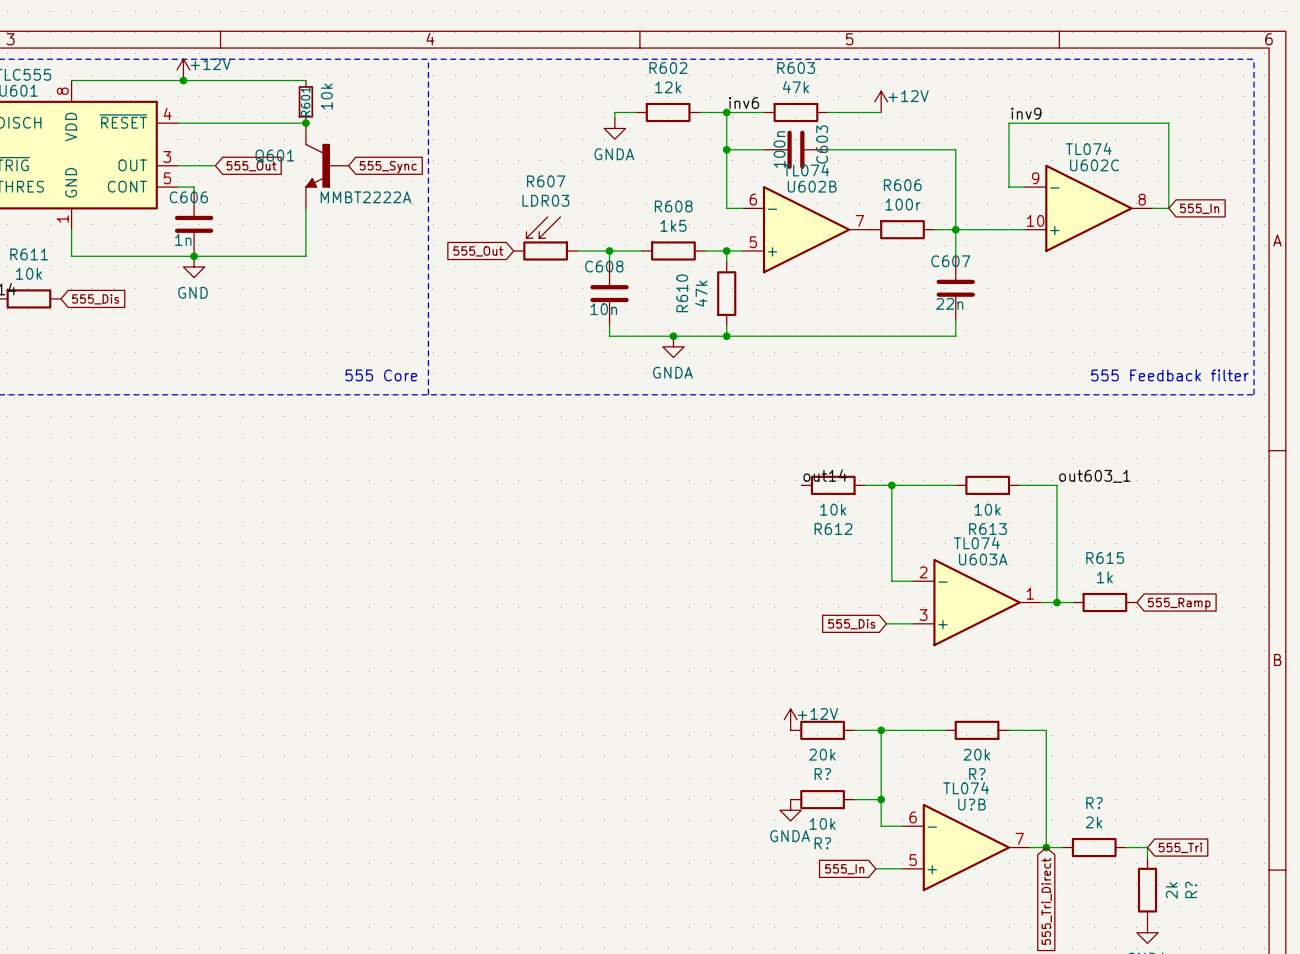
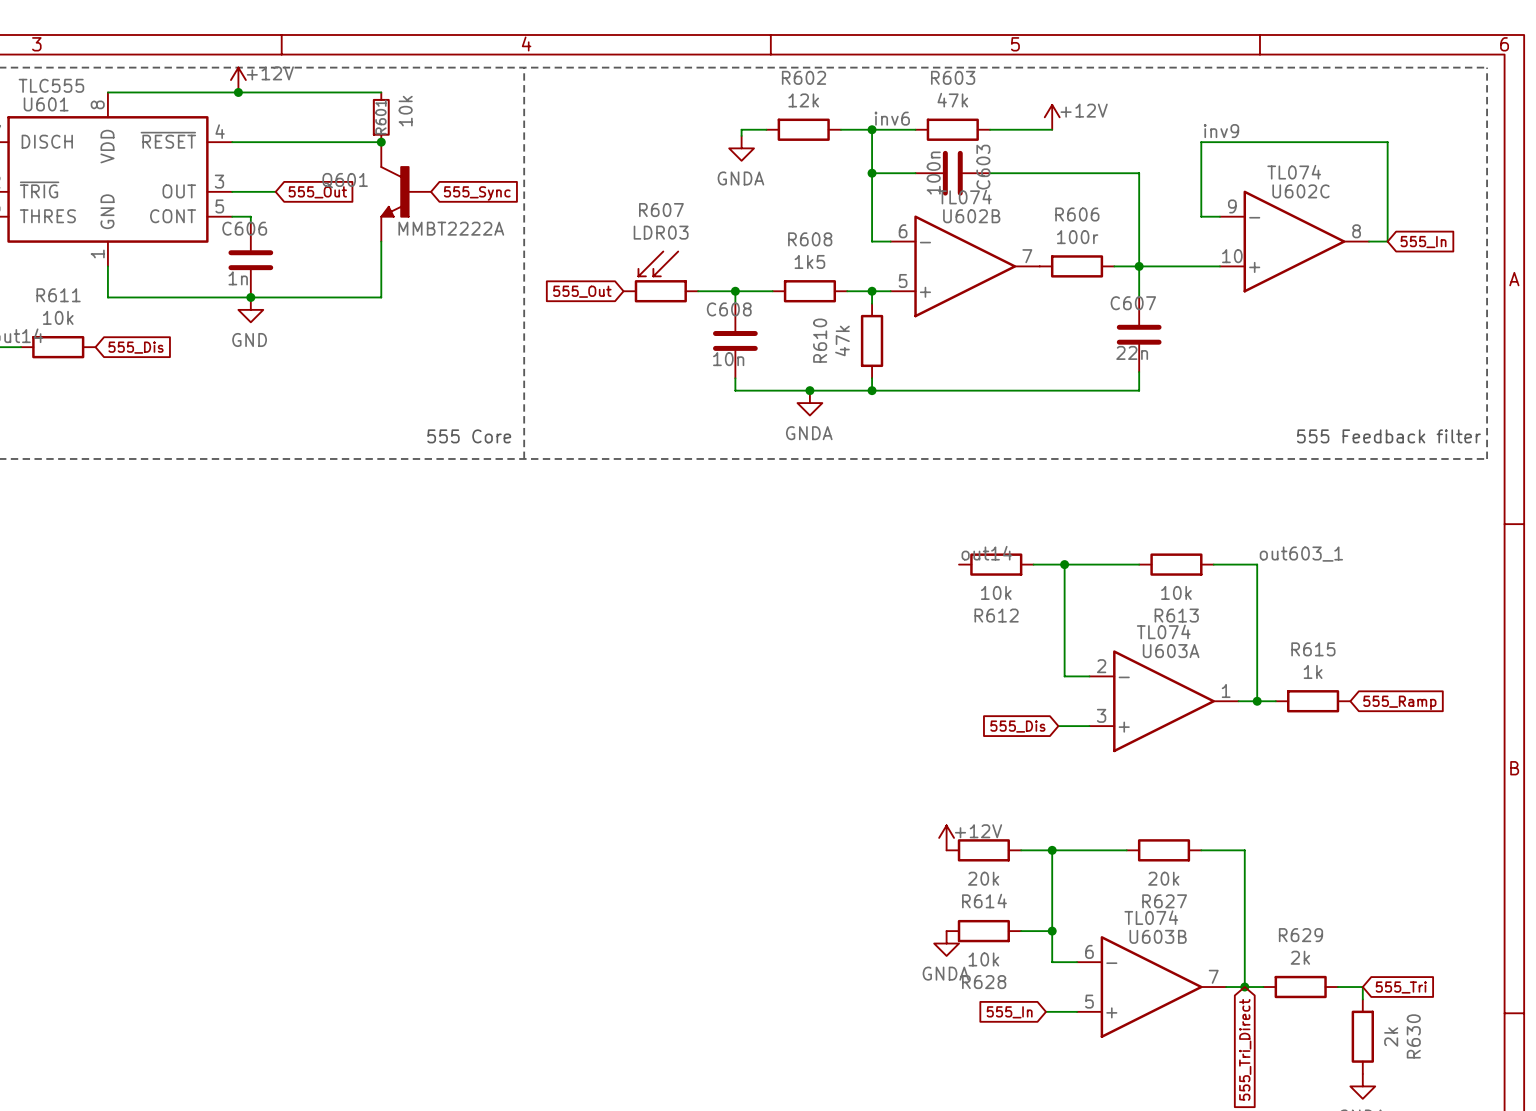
R? name: R? (822, 774) -> R614 (984, 901)
R? name: R? (977, 774) -> R627 (1164, 901)
R? name: R? (1094, 803) -> R629 (1300, 935)
U?B name: U?B (971, 804) -> U603B (1158, 936)
R? name: R? (822, 843) -> R628 (984, 982)
R? name: R? (1191, 889) -> R630 (1413, 1036)

